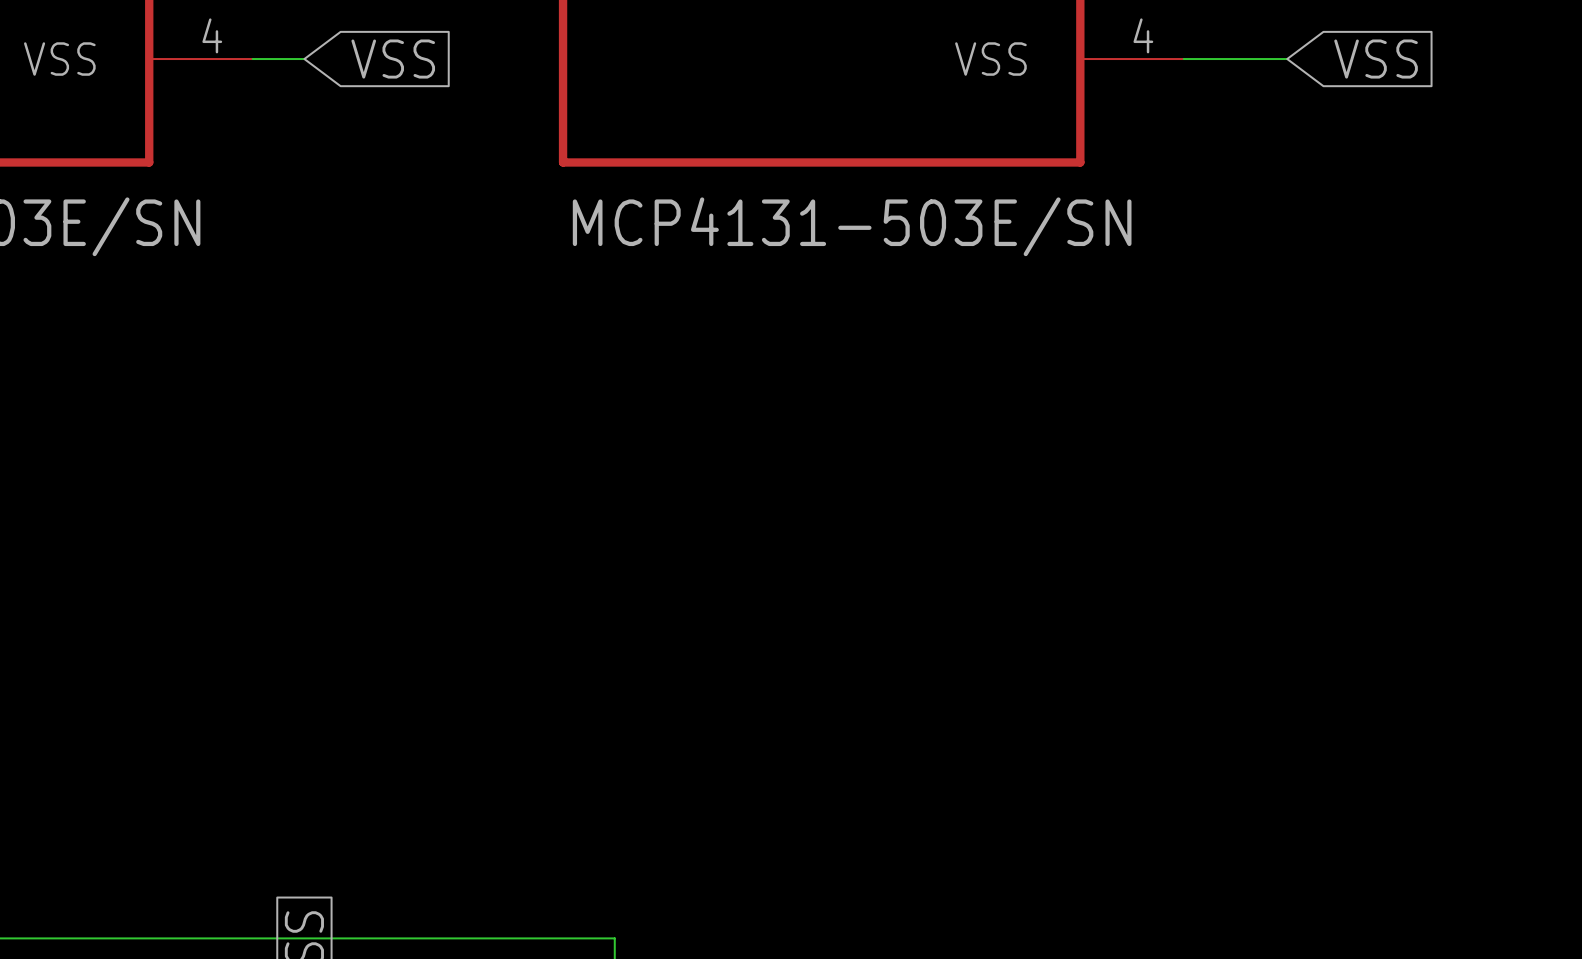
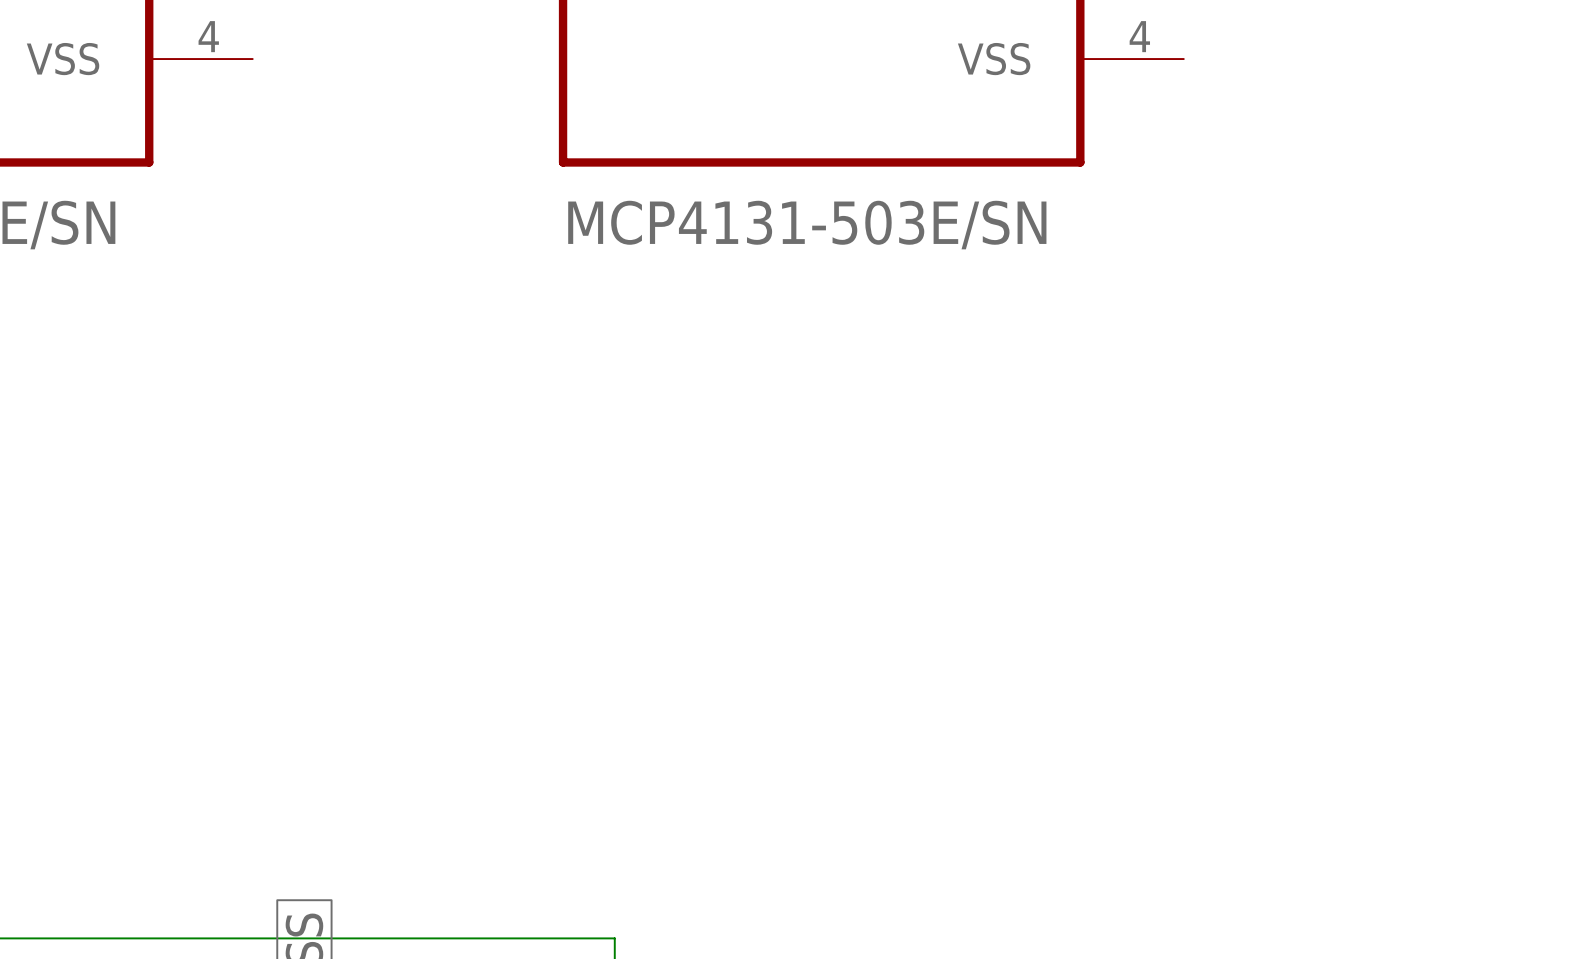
wire: (252, 59) (304, 59) -> none
global label: VSS (393, 59) -> none
wire: (1183, 59) (1287, 59) -> none
global label: VSS (1376, 59) -> none

